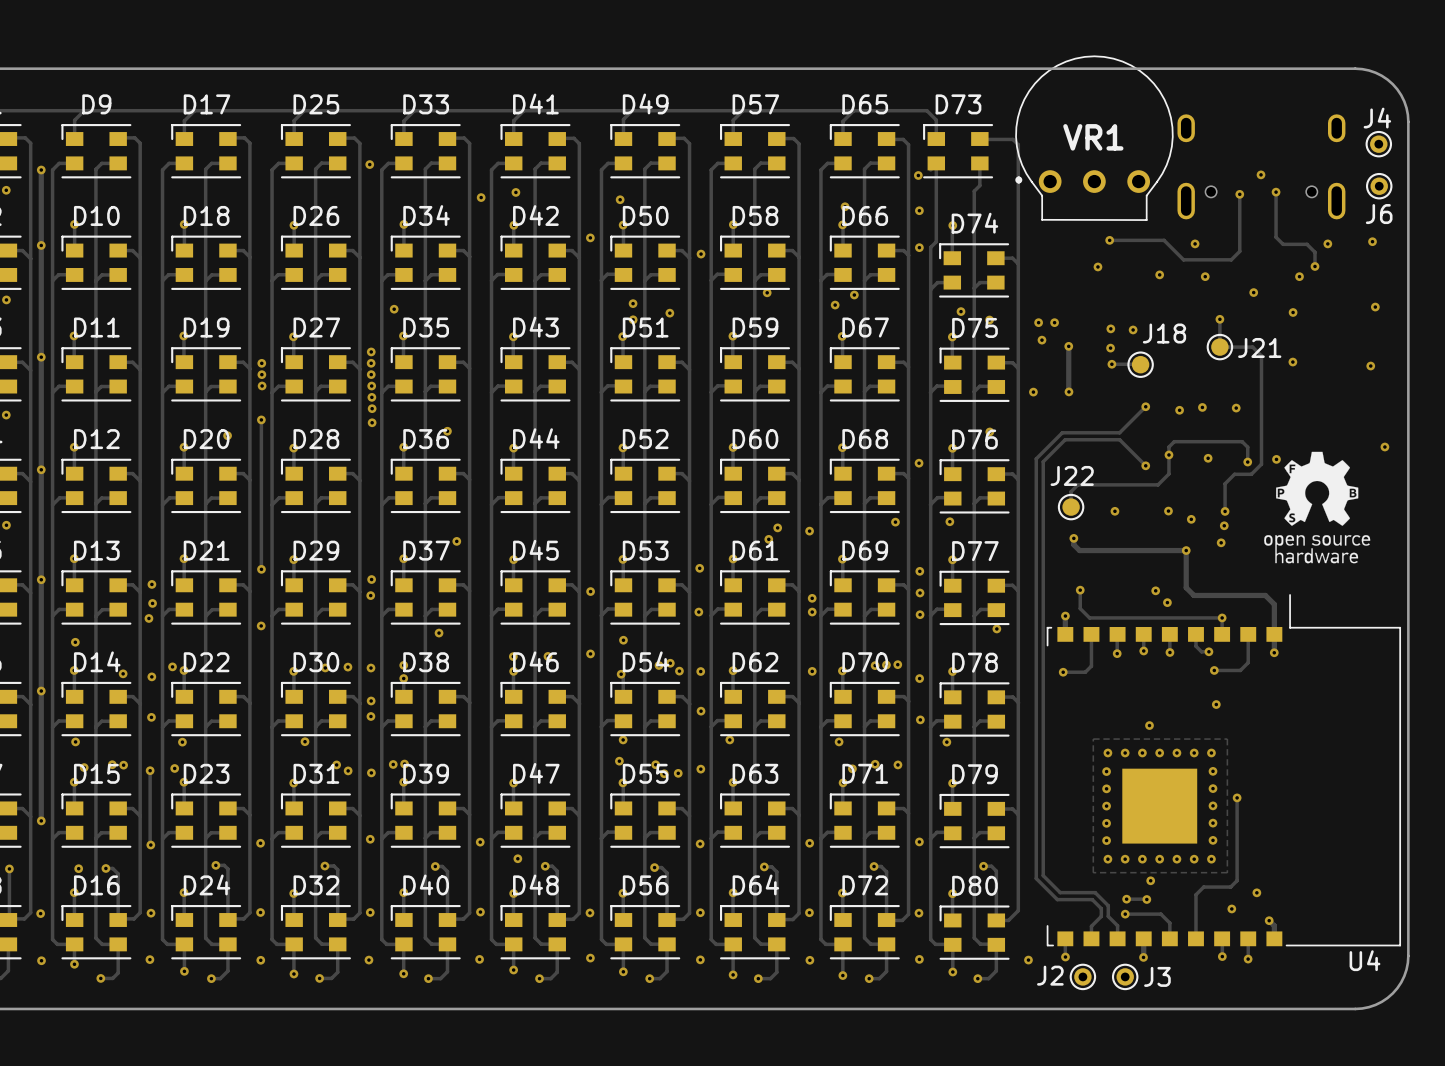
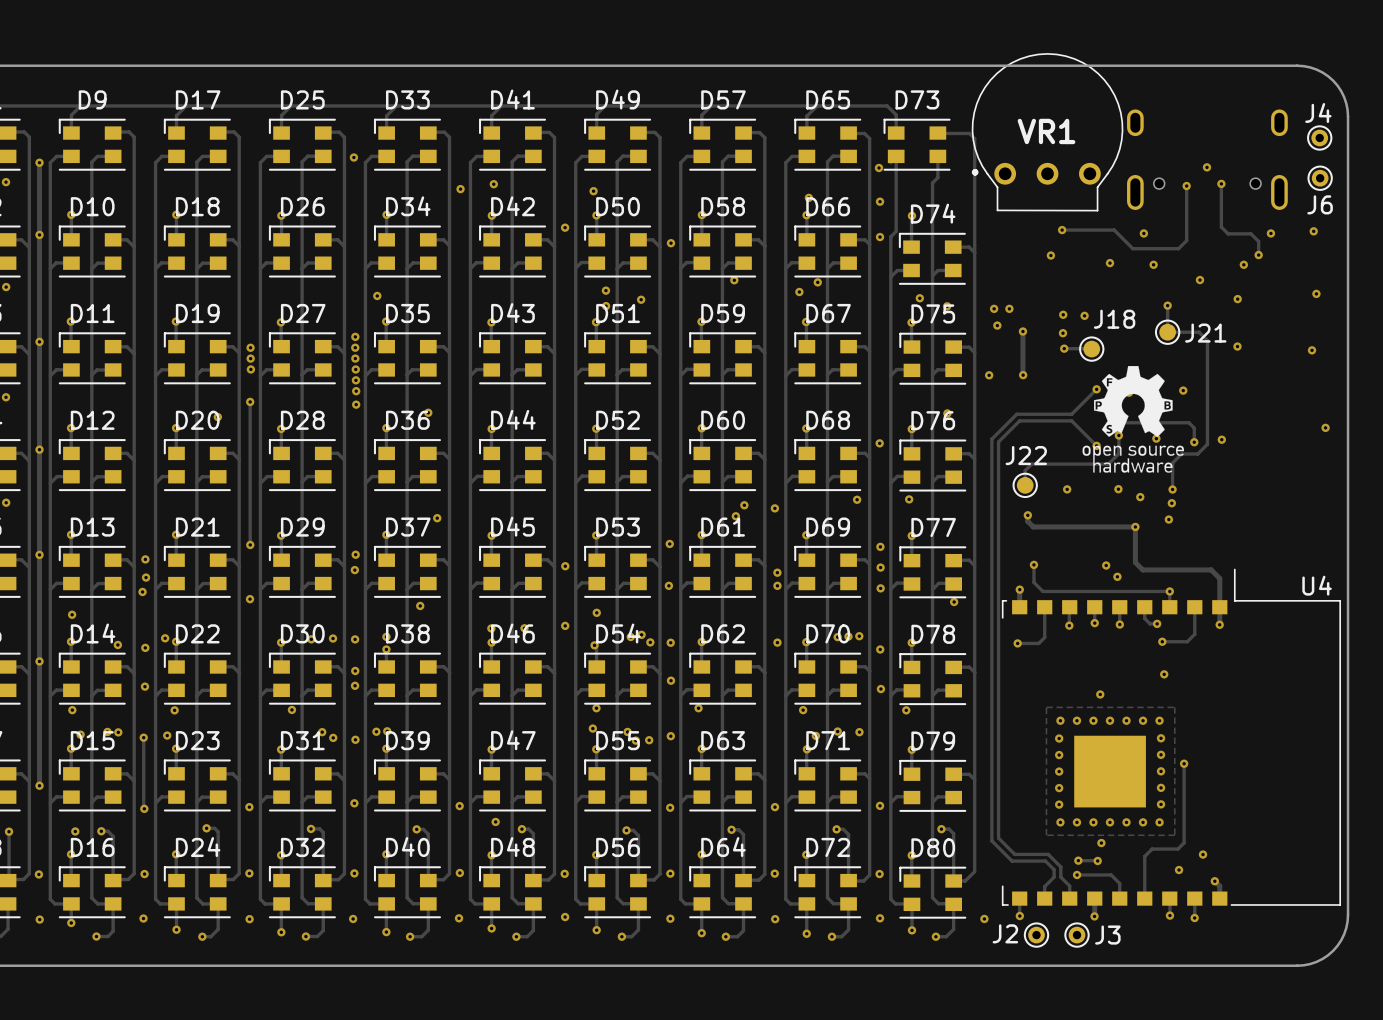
drawing position: (1317, 507) -> (1133, 419)
U4 name position: U4 (1364, 960) -> U4 (1317, 585)

